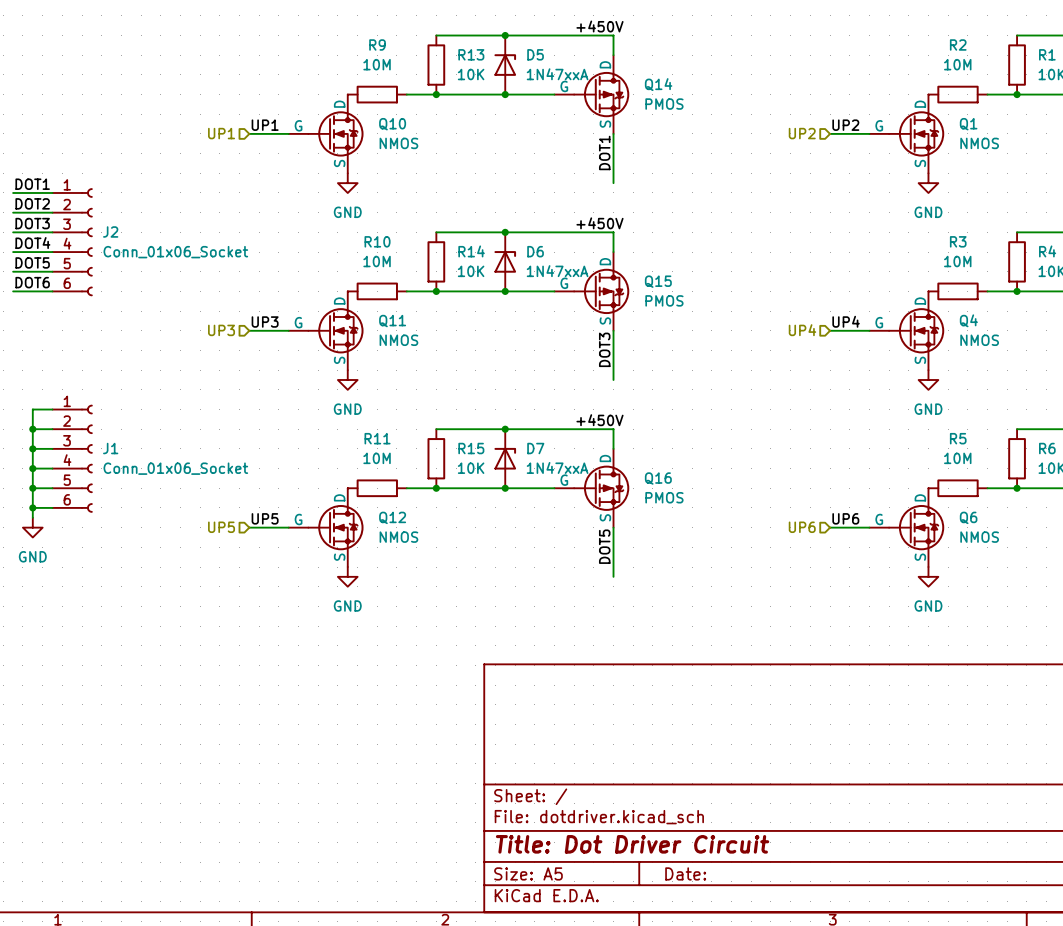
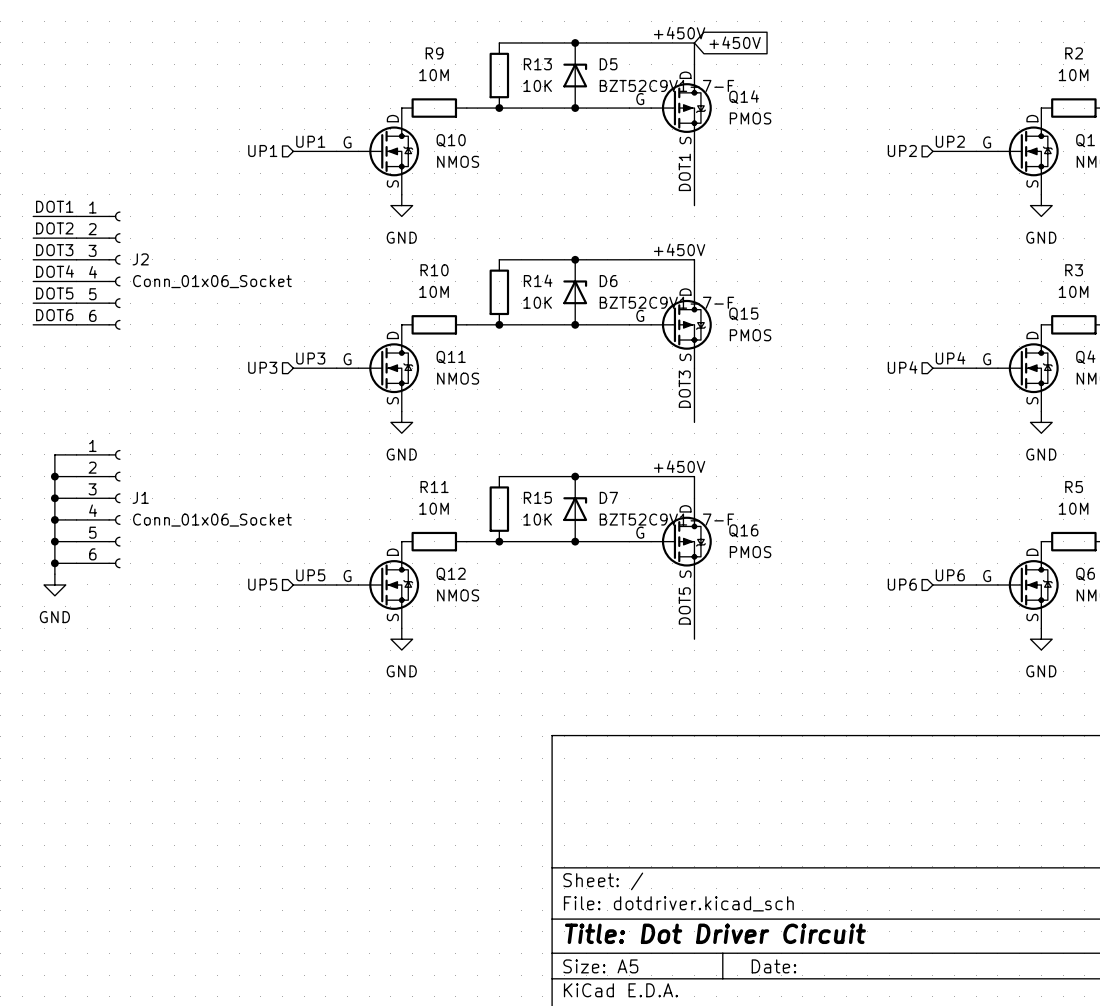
global label: none -> +450V (735, 42)
D5 value: 1N47xxA (557, 74) -> BZT52C9V1-7-F (666, 85)
D6 value: 1N47xxA (557, 271) -> BZT52C9V1-7-F (666, 302)
D7 value: 1N47xxA (557, 467) -> BZT52C9V1-7-F (666, 519)

